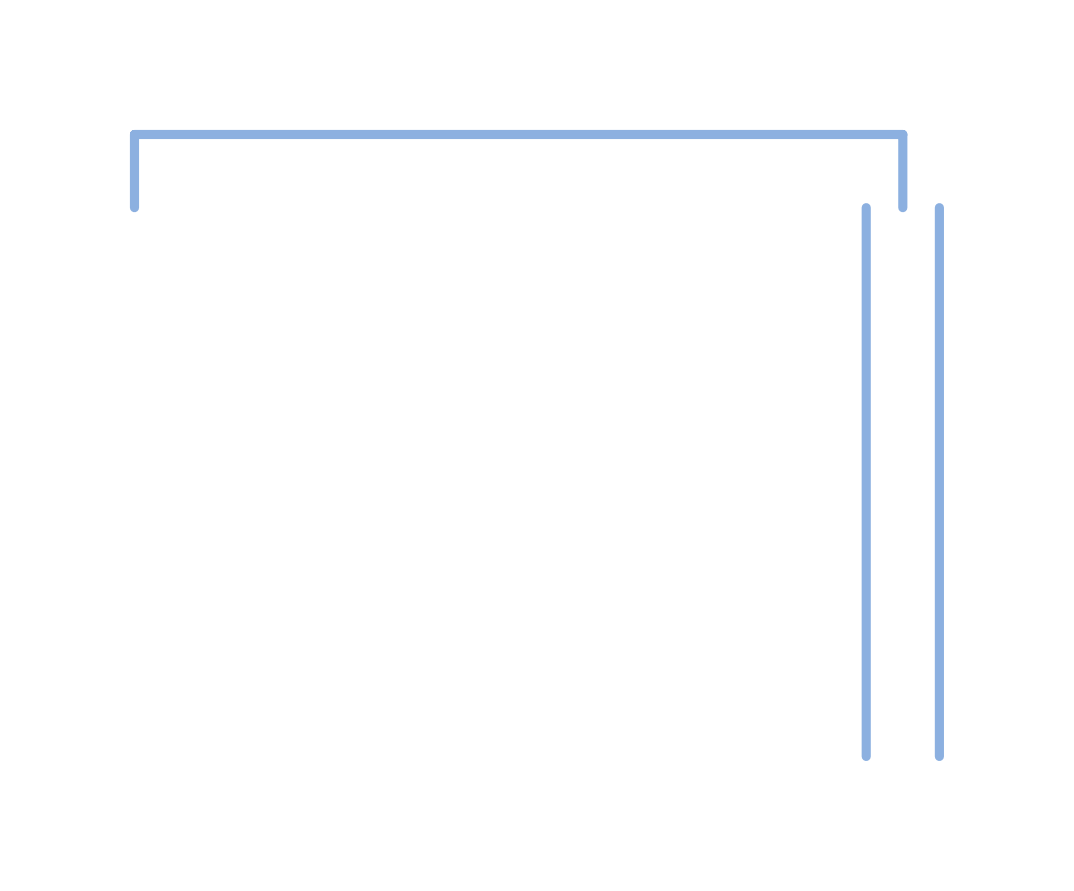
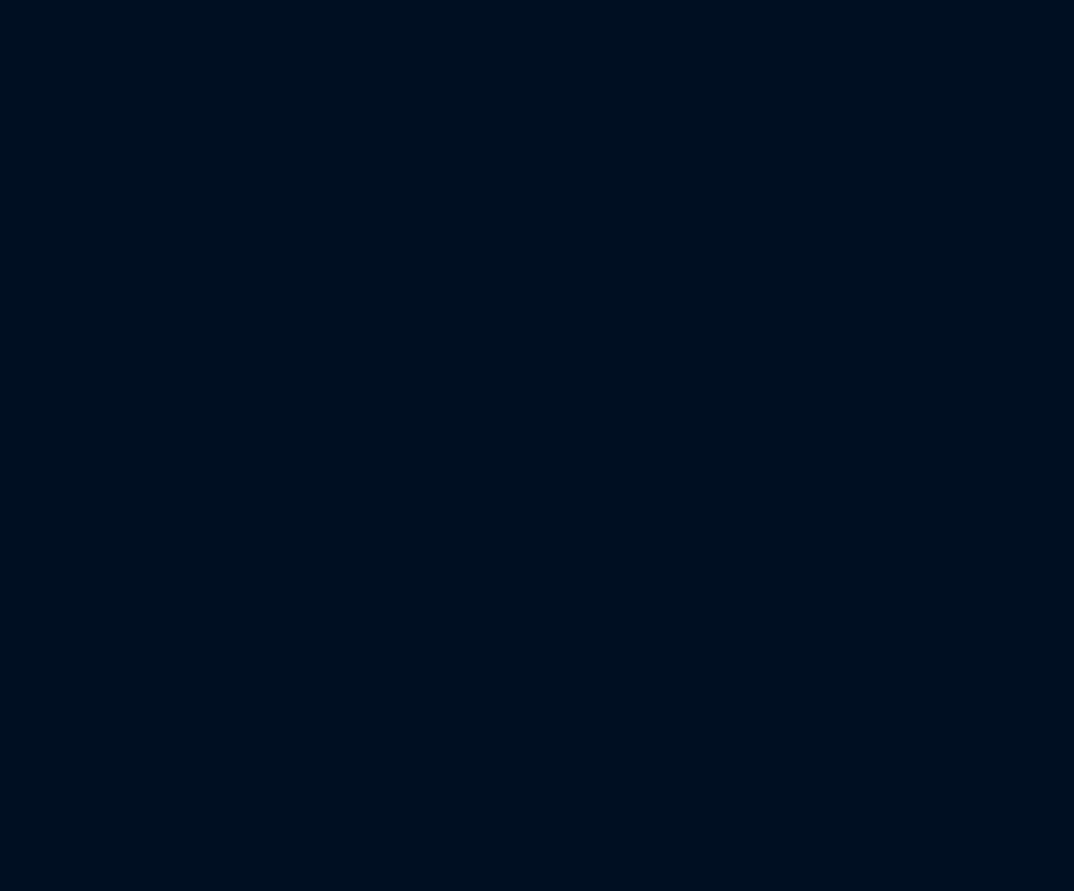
bottom track: (866, 207) (866, 756) -> none
bottom track: (902, 207) (902, 134) (134, 134) (134, 207) -> none
bottom track: (939, 207) (939, 756) -> none

